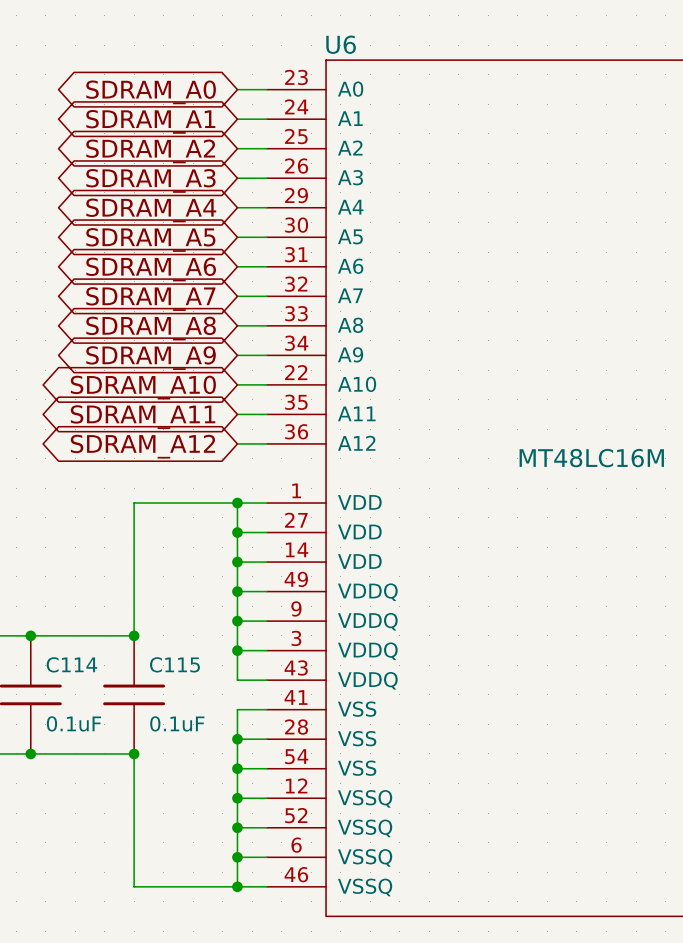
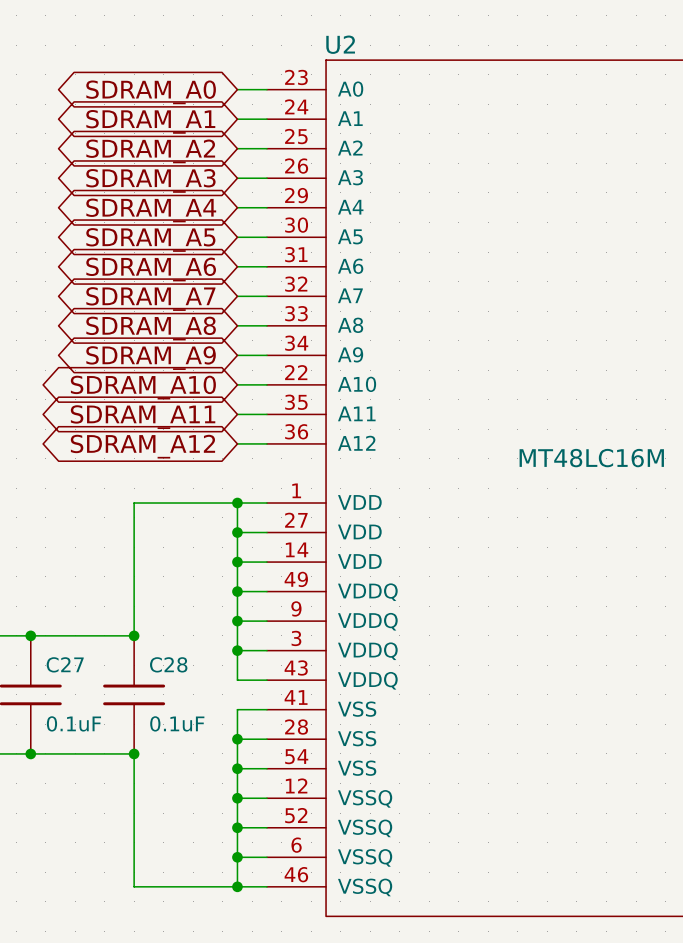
U6 name: U6 (341, 44) -> U2 (340, 44)
C114 name: C114 (71, 664) -> C27 (65, 664)
C115 name: C115 (174, 664) -> C28 (168, 664)

